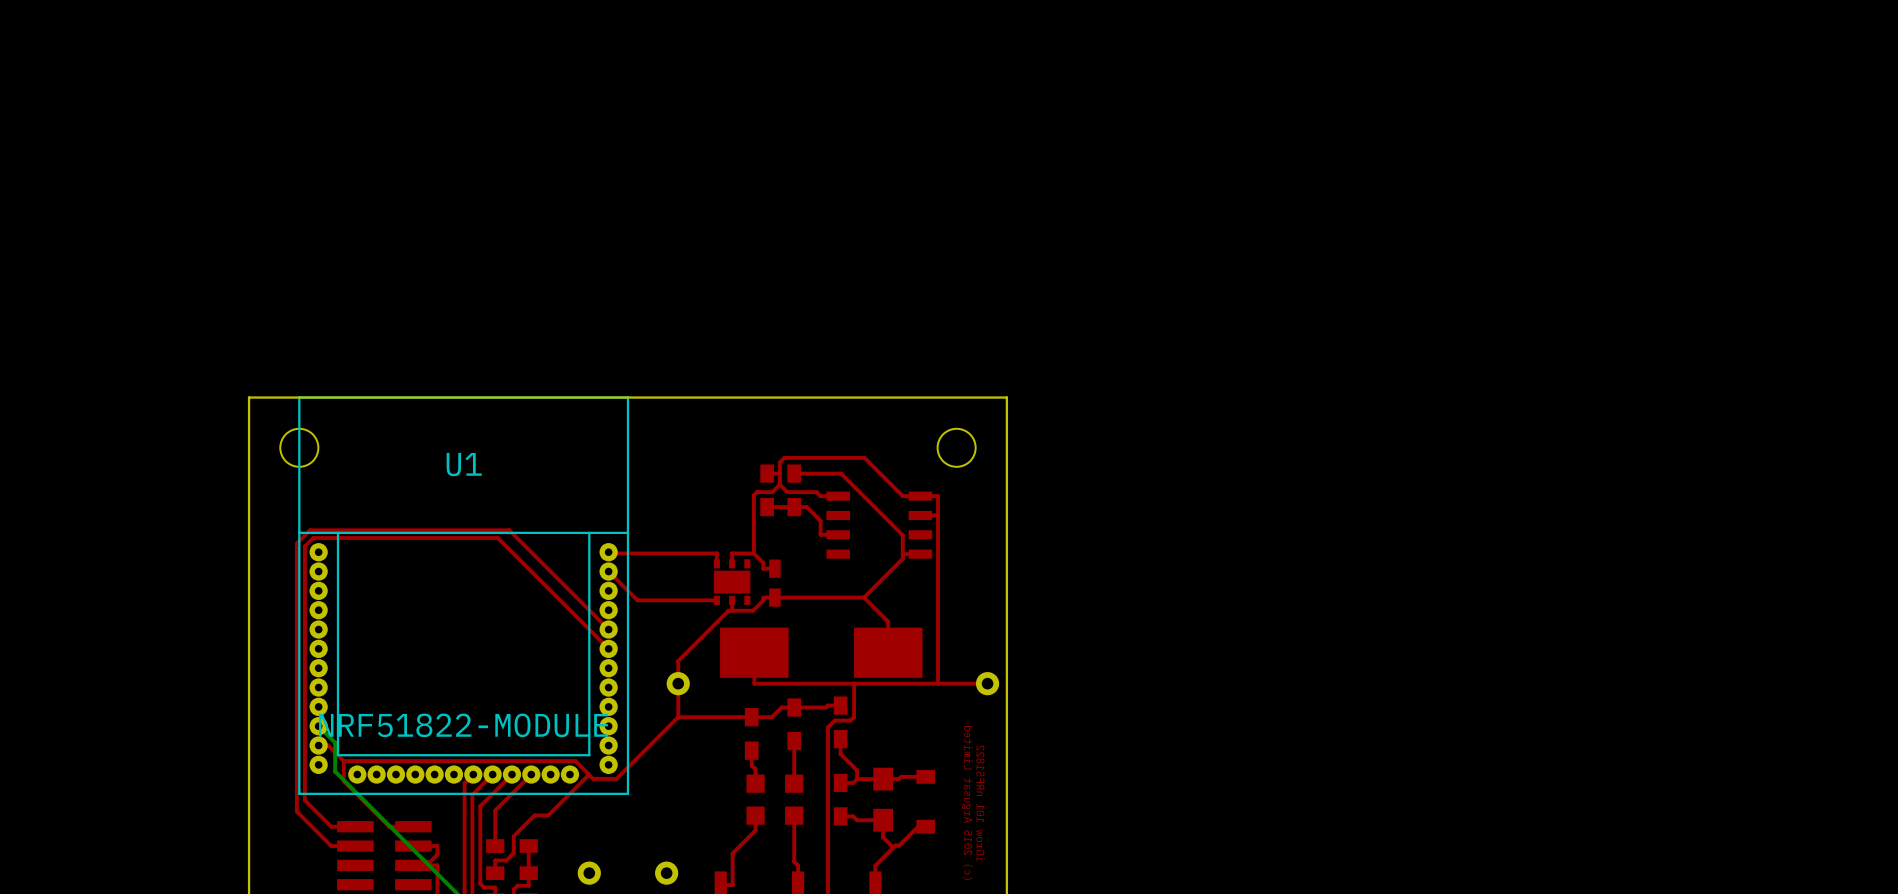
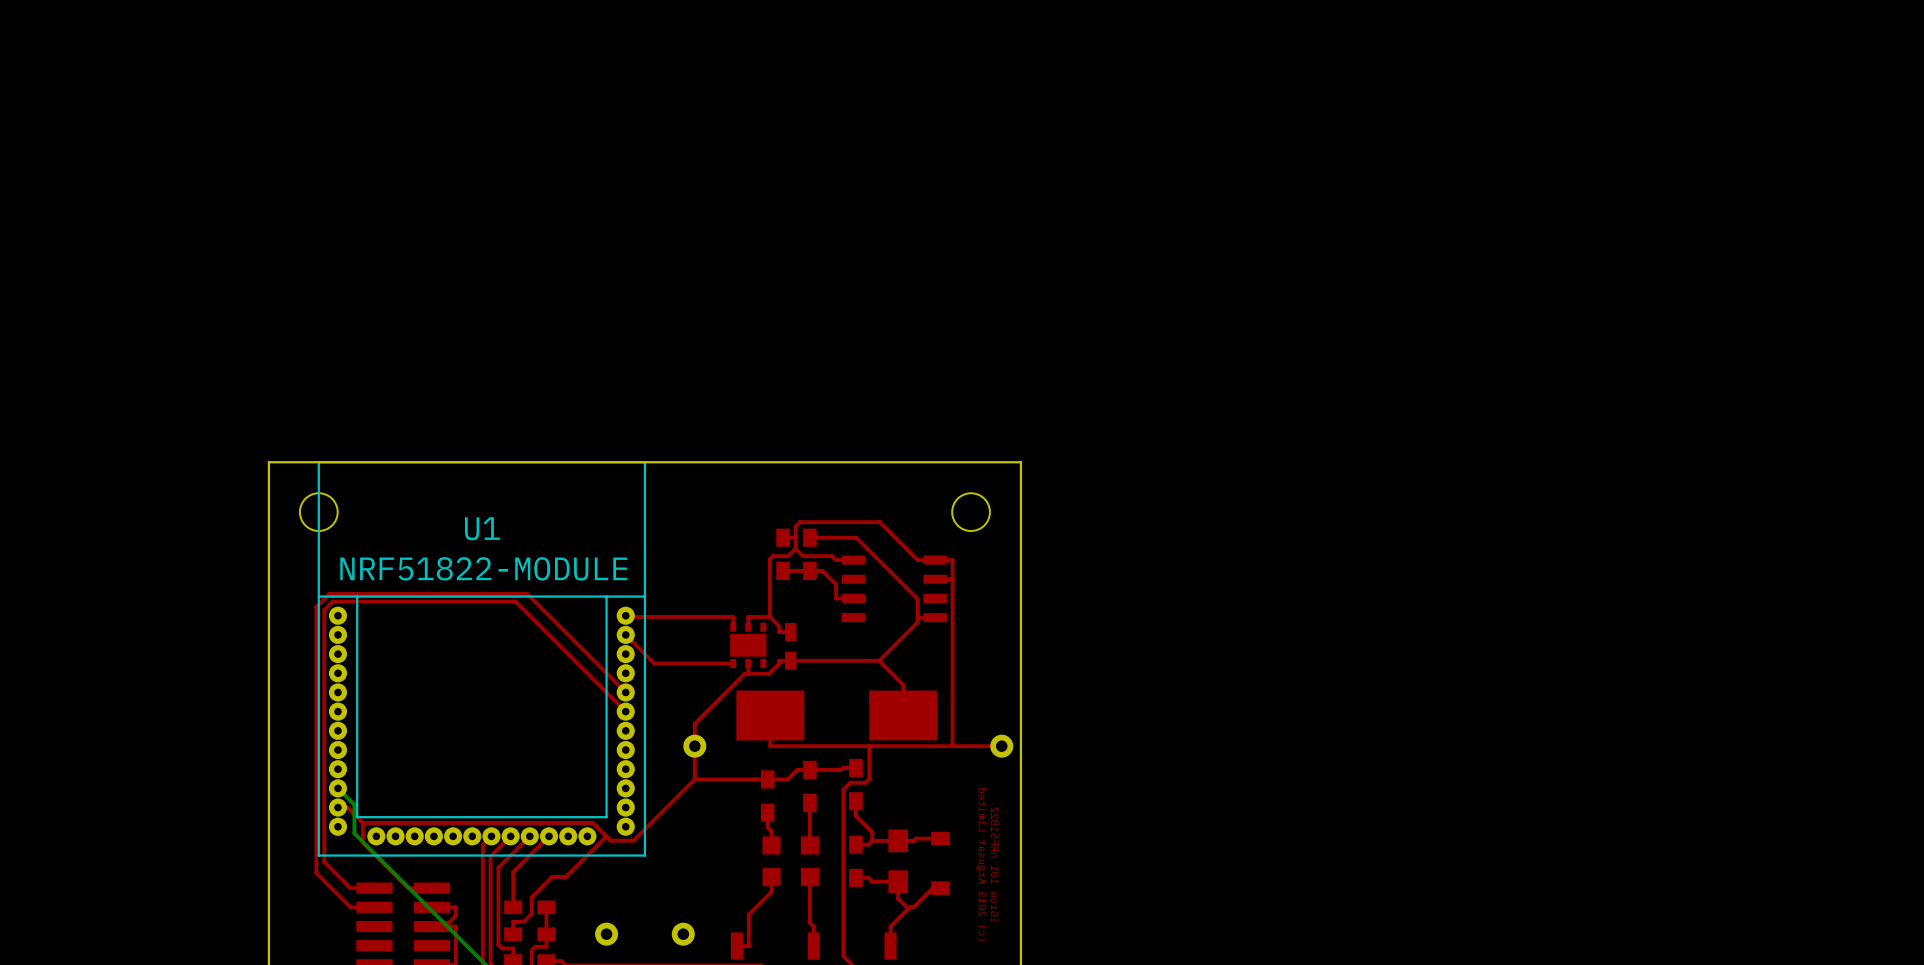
U1 value position: NRF51822-MODULE (463, 725) -> NRF51822-MODULE (483, 568)

